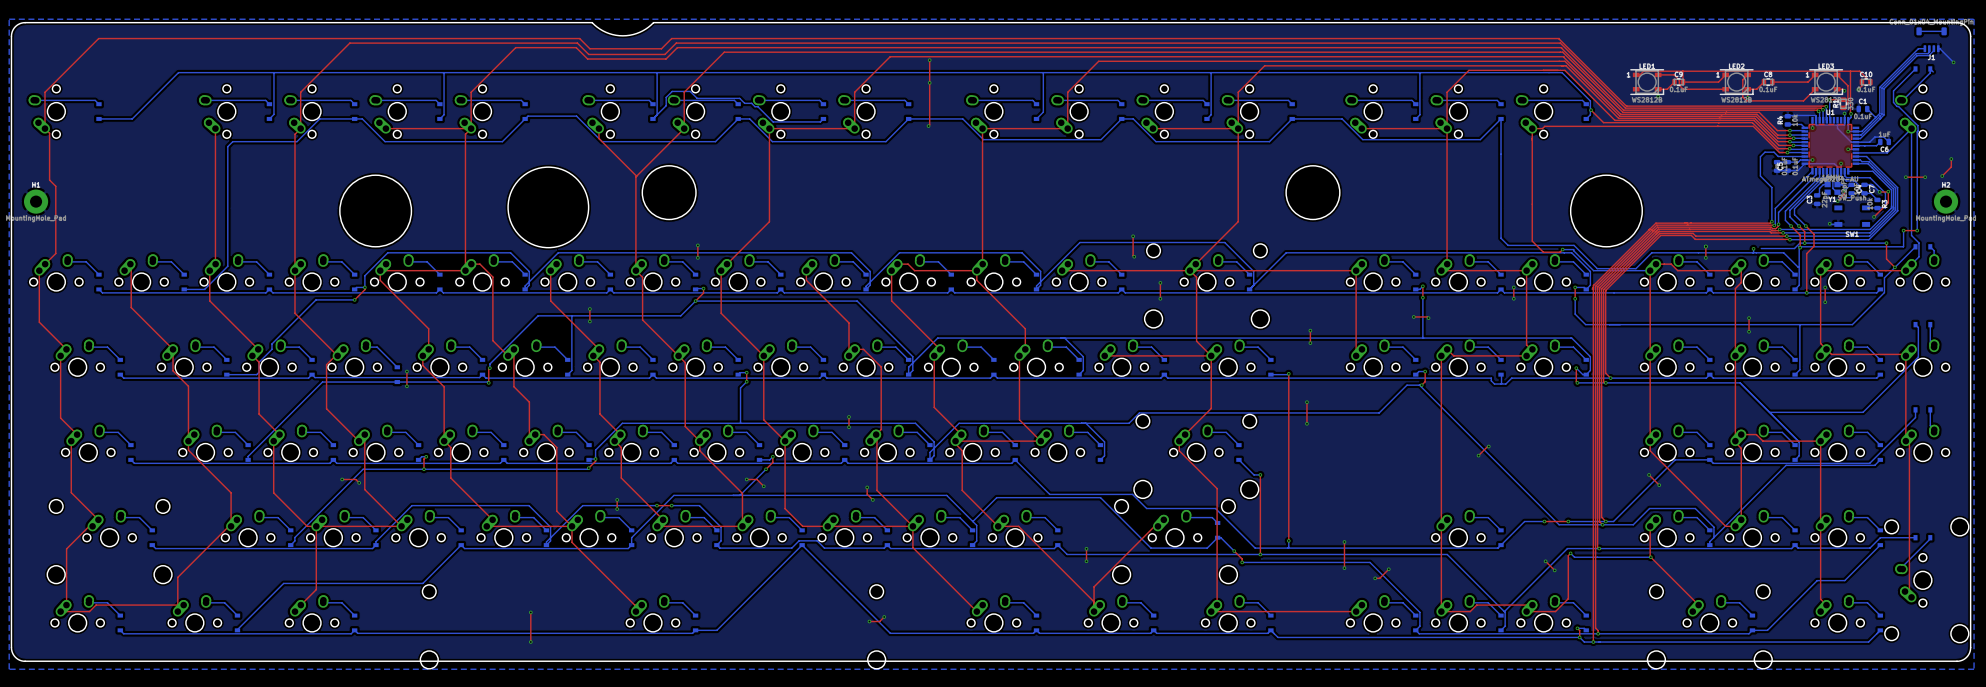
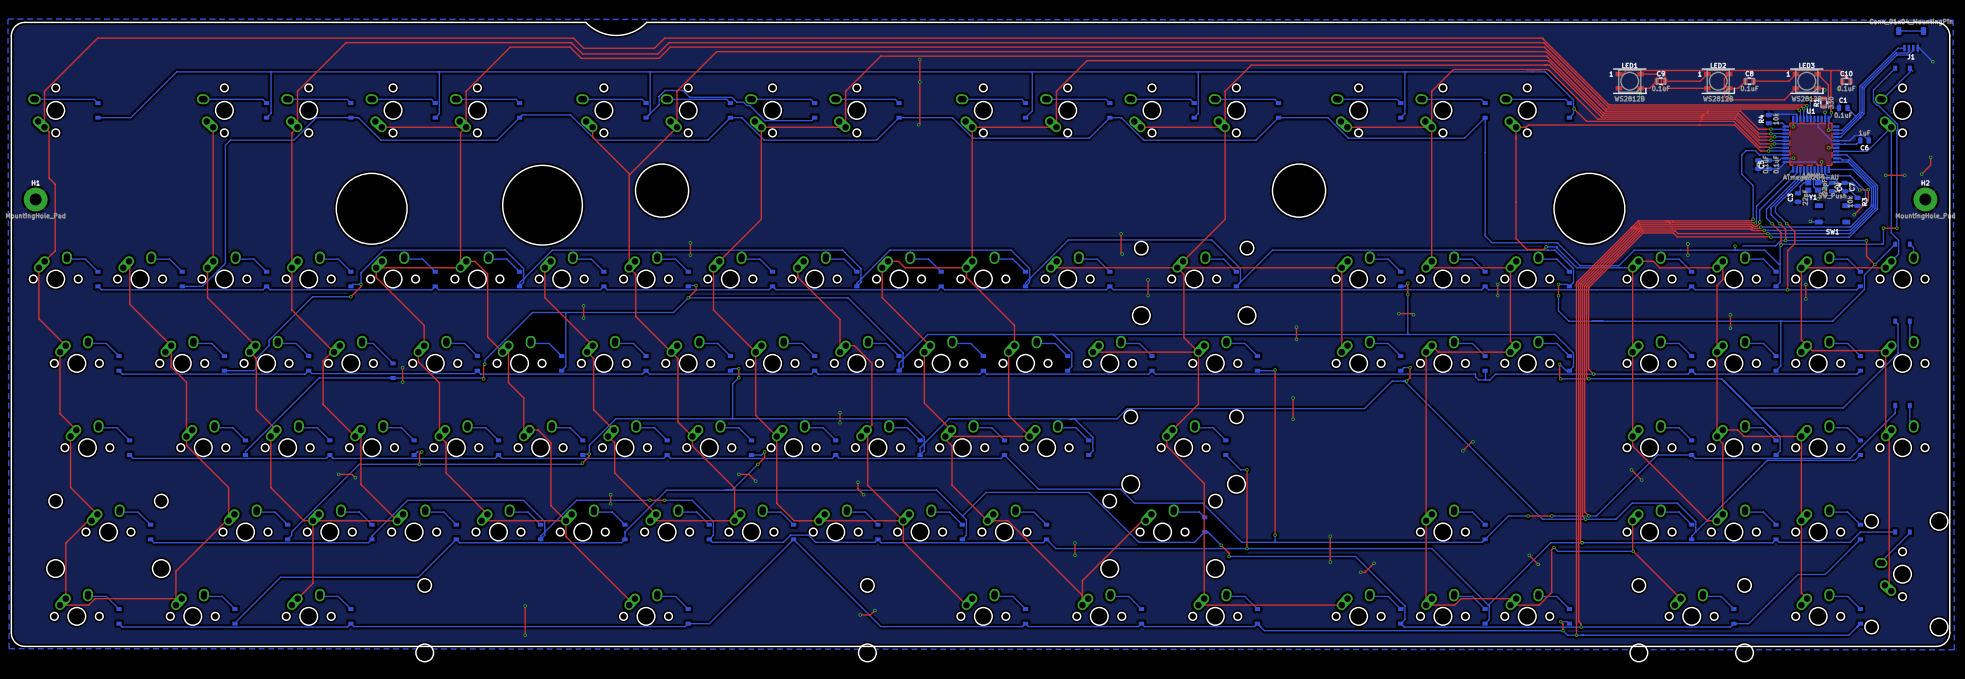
bottom zone outline: (9, 19) (9, 669) (1974, 669) (1974, 19) (9, 19) -> (7, 19) (9, 648) (1954, 649) (1953, 20) (7, 19)
board edge: (11, 639) (13, 654) (18, 659) (25, 661) -> (11, 632) (15, 642) (24, 646) (1936, 646) (1945, 642) (1949, 632)
board edge: (1970, 639) (1968, 654) (1963, 659) (1956, 661) -> none
board edge: (25, 661) (1956, 661) -> none

